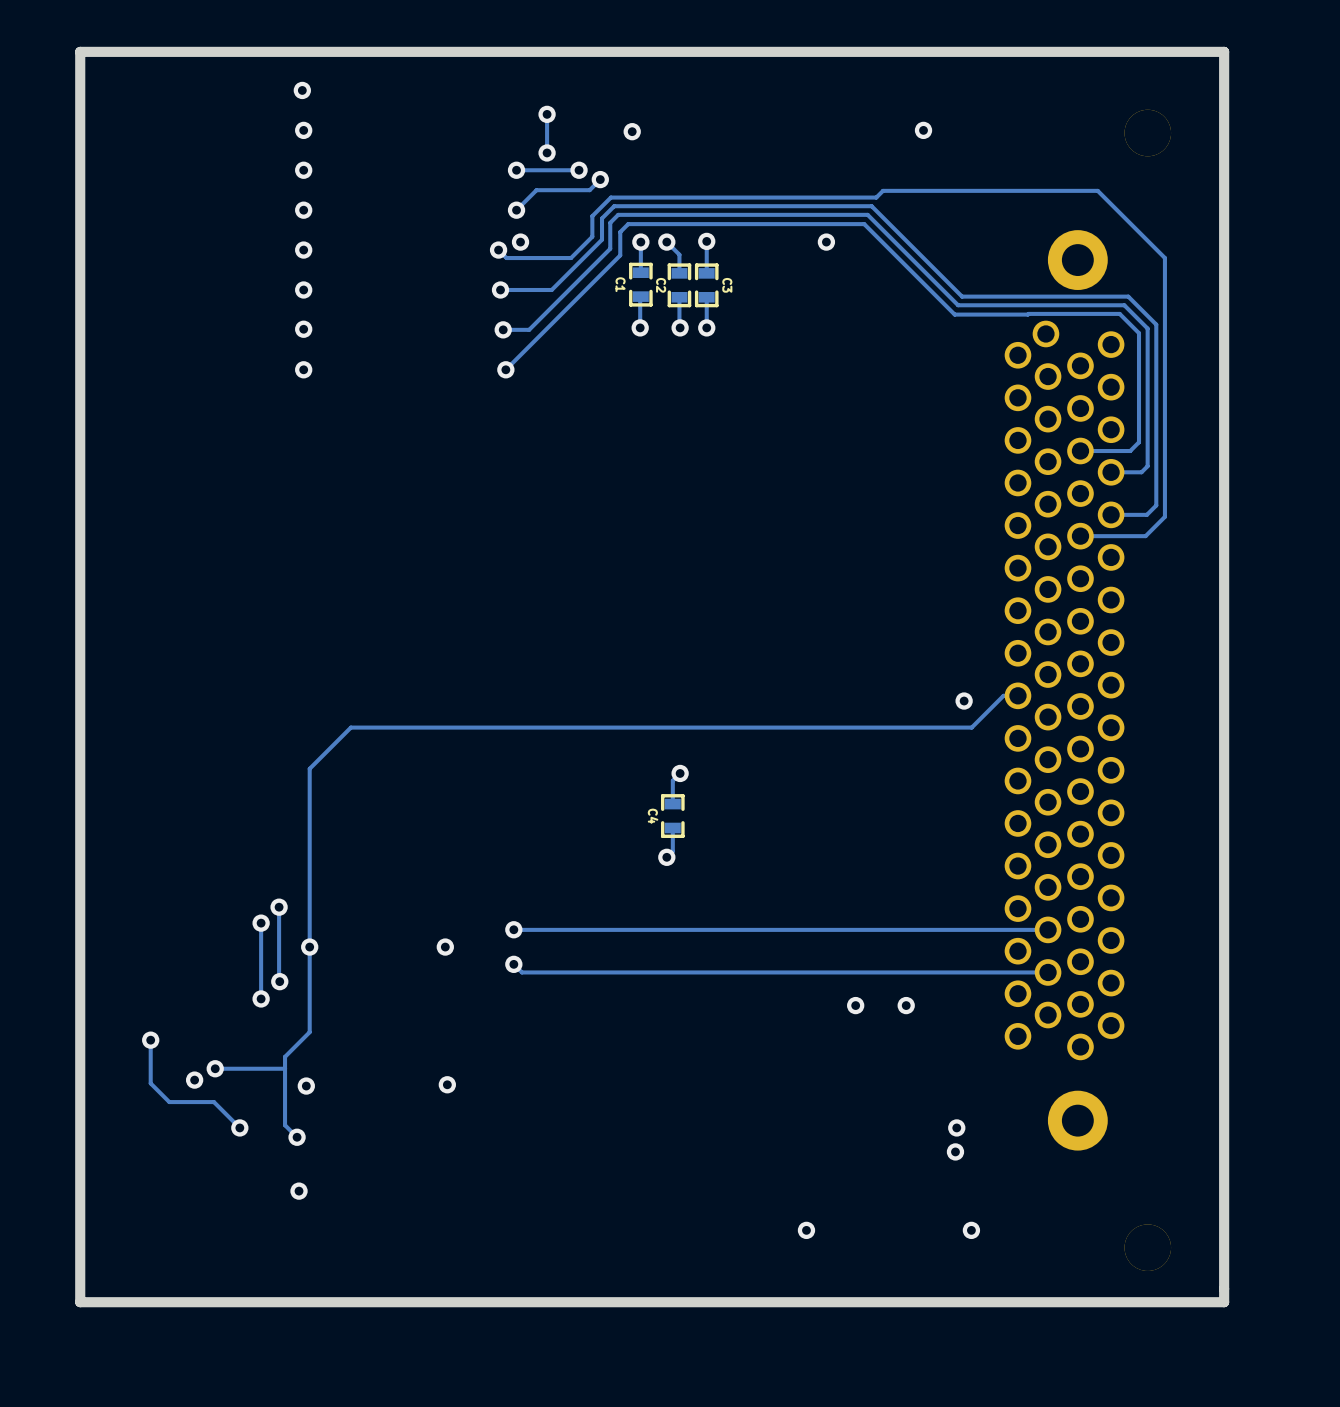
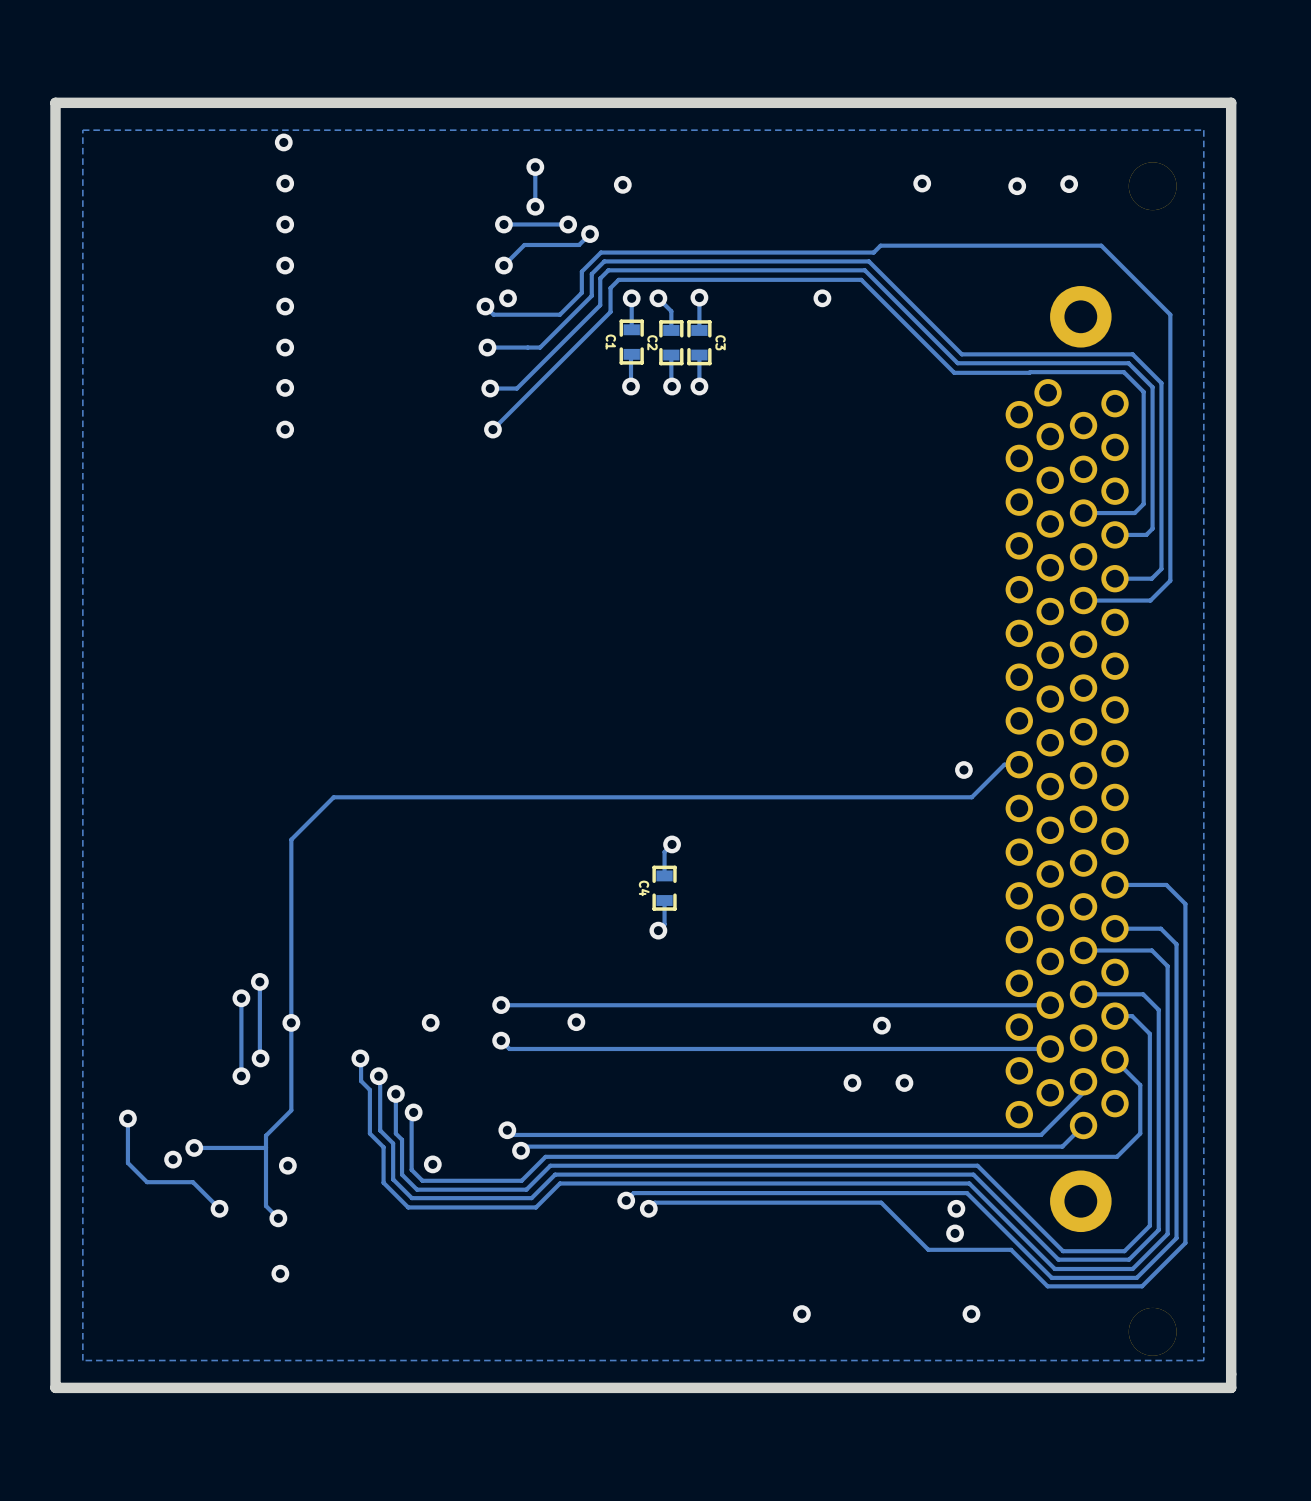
zone outline: none -> (1203, 130) (1203, 1360) (82, 1360) (82, 130) (1203, 130)
via: none -> (1069, 184)
via: none -> (1017, 186)
track: none -> (1114, 884) (1166, 884) (1185, 903) (1185, 1243) (1142, 1286) (1047, 1286) (1011, 1249) (928, 1249) (881, 1202) (654, 1202) (648, 1208)
track: none -> (1114, 928) (1160, 928) (1176, 944) (1176, 1238) (1136, 1277) (1051, 1277) (967, 1193) (633, 1193) (626, 1200)
track: none -> (1083, 950) (1151, 950) (1167, 966) (1167, 1234) (1132, 1268) (1054, 1268) (969, 1183) (559, 1183) (536, 1207) (408, 1207) (383, 1182) (383, 1147) (369, 1133) (369, 1089) (361, 1081) (360, 1058)
track: none -> (1083, 994) (1143, 994) (1158, 1009) (1158, 1229) (1129, 1259) (1058, 1259) (973, 1174) (555, 1174) (531, 1198) (411, 1198) (393, 1179) (393, 1143) (380, 1130) (378, 1076)
track: none -> (1114, 1016) (1132, 1016) (1149, 1033) (1149, 1225) (1124, 1251) (1063, 1251) (977, 1165) (550, 1165) (526, 1189) (417, 1189) (402, 1174) (402, 1139) (395, 1133) (395, 1093)
via: none -> (576, 1022)
via: none -> (881, 1025)
via: none -> (360, 1058)
track: none -> (1114, 1059) (1140, 1085) (1140, 1133) (1117, 1156) (545, 1156) (521, 1180) (422, 1180) (411, 1169) (411, 1114) (413, 1112)
via: none -> (378, 1076)
track: none -> (1083, 1081) (1083, 1092) (1041, 1134) (512, 1134) (507, 1130)
via: none -> (395, 1093)
via: none -> (413, 1112)
track: none -> (1083, 1125) (1062, 1146) (525, 1146) (521, 1150)
via: none -> (507, 1130)
via: none -> (521, 1150)
via: none -> (626, 1200)
via: none -> (648, 1208)

